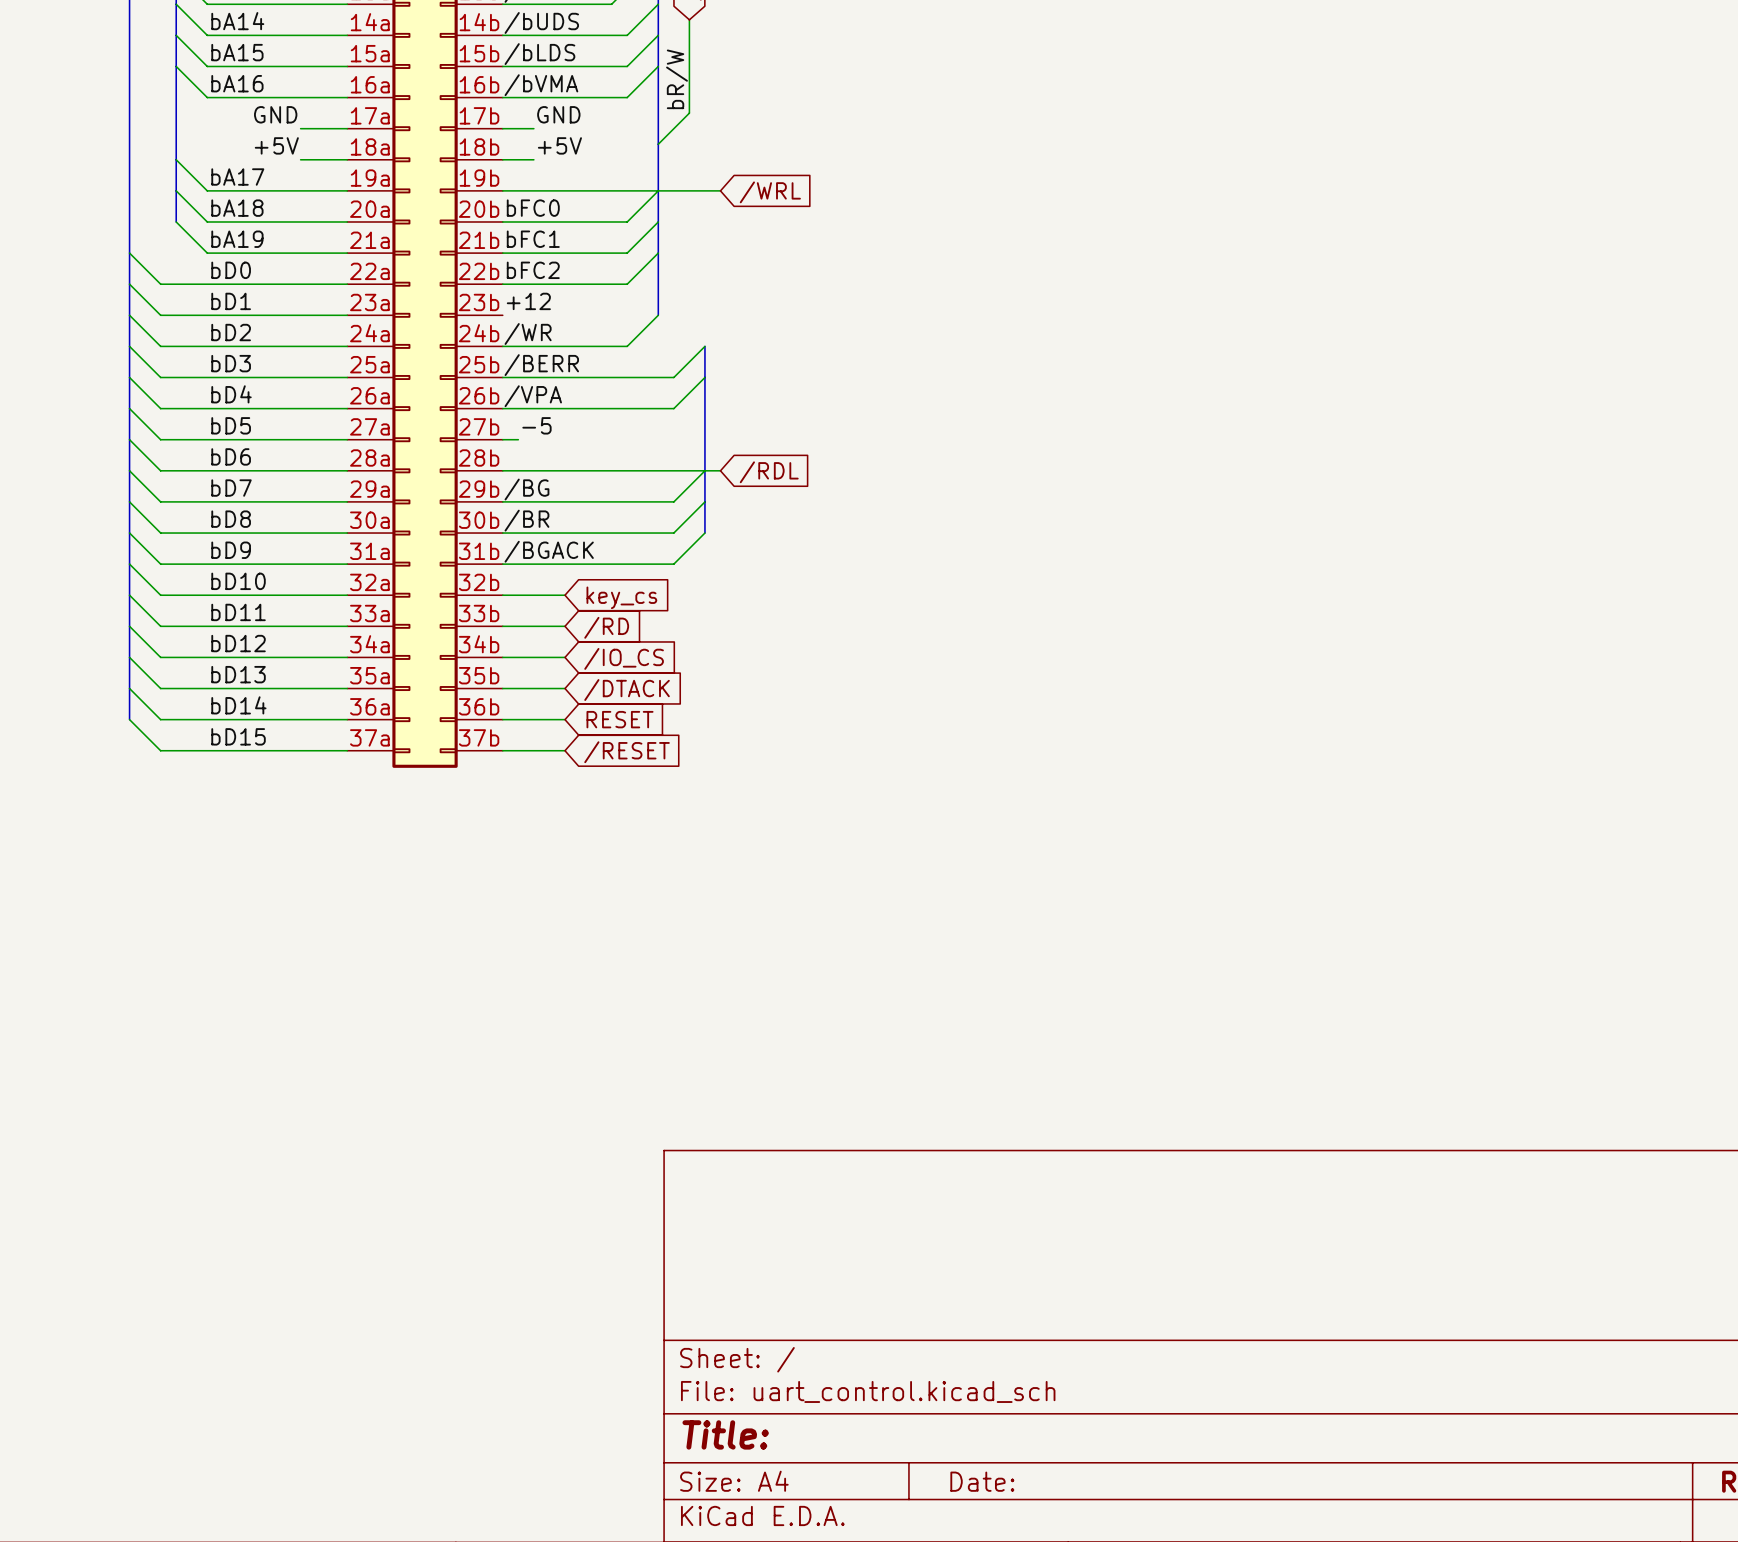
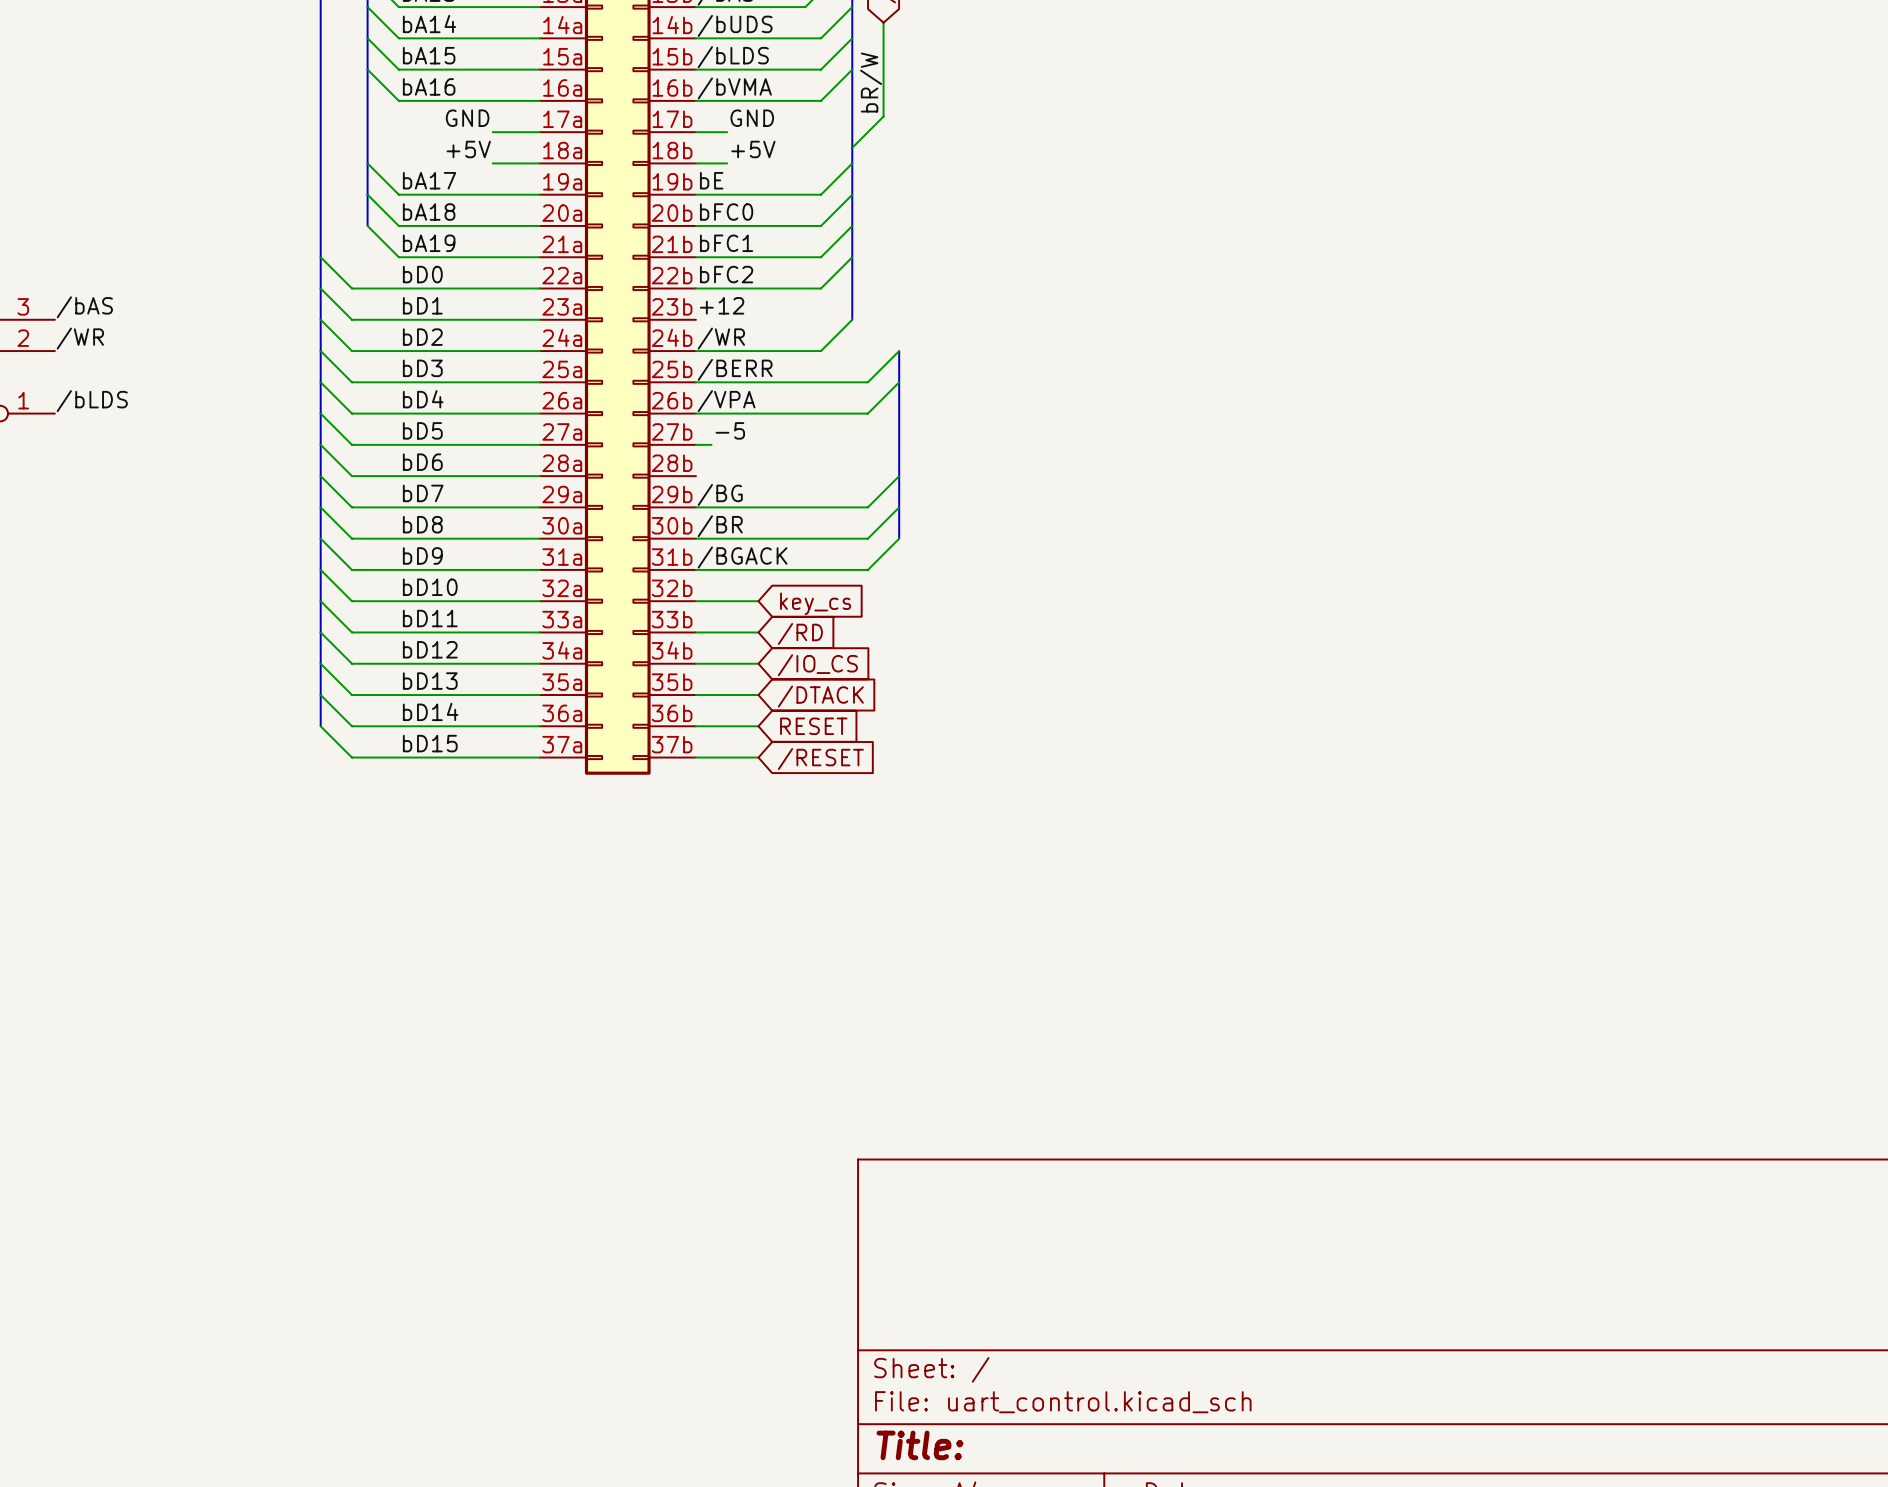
label: none -> bE (711, 180)
wire: (627, 190) (720, 190) -> (821, 194) (852, 163)
global label: /WRL (770, 192) -> none
wire: (502, 470) (720, 470) -> none
global label: /RDL (769, 472) -> none

